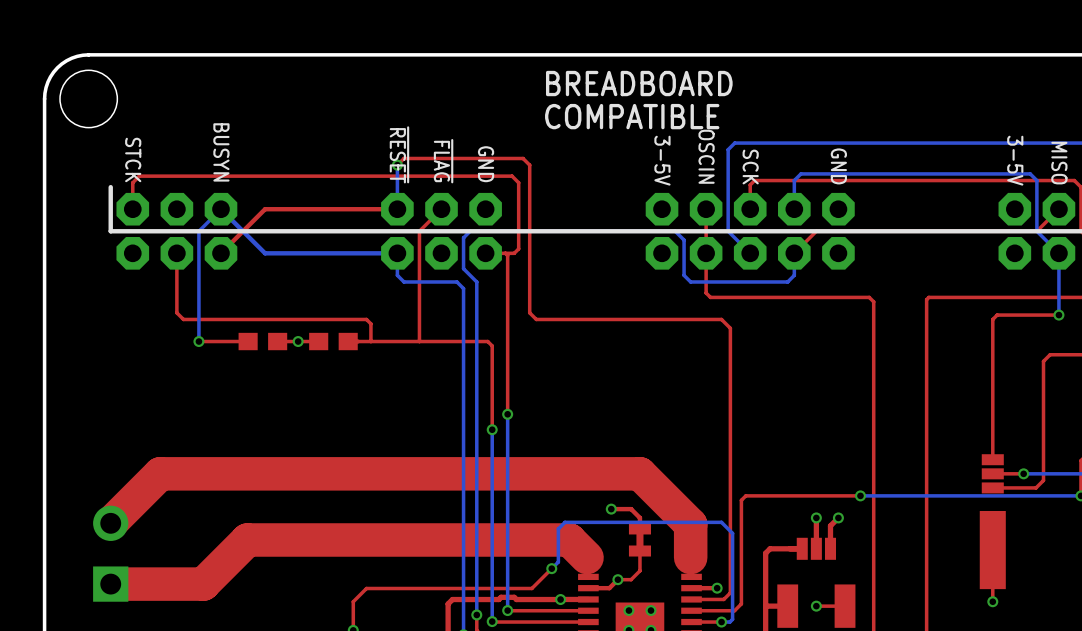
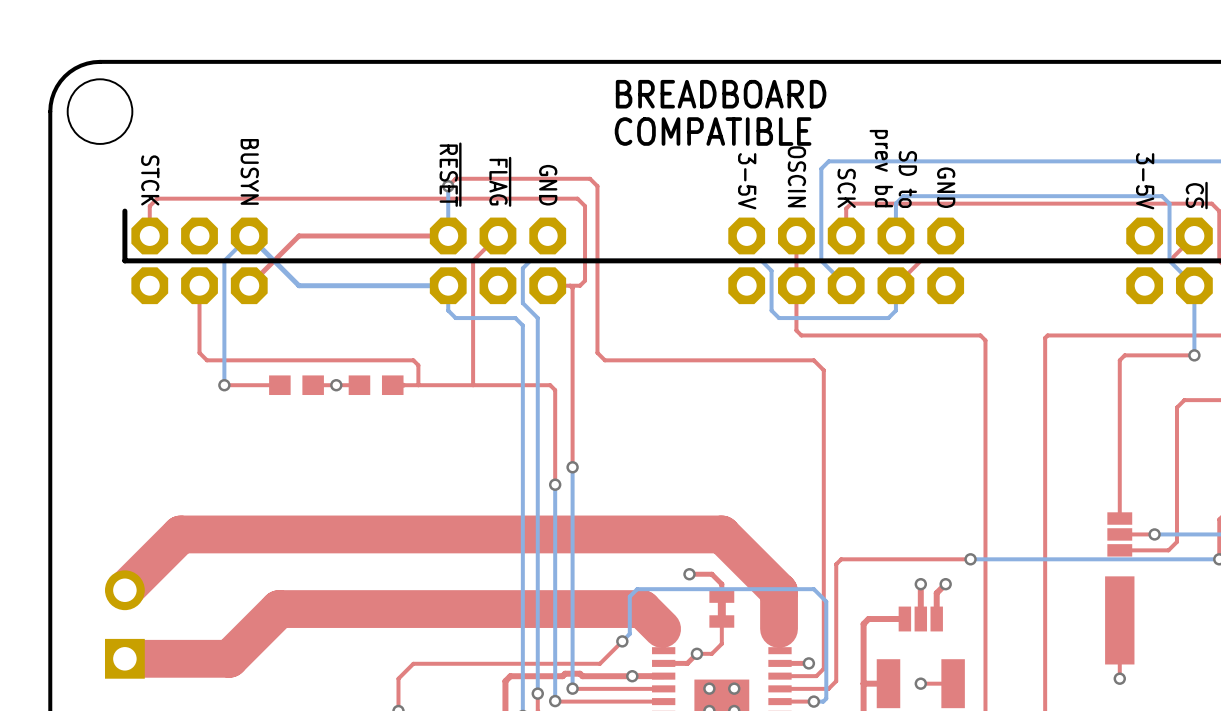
text: none -> prev bd (881, 168)
text: none -> SD to (907, 179)
text: MISO (1059, 163) -> ~{CS} (1196, 195)

